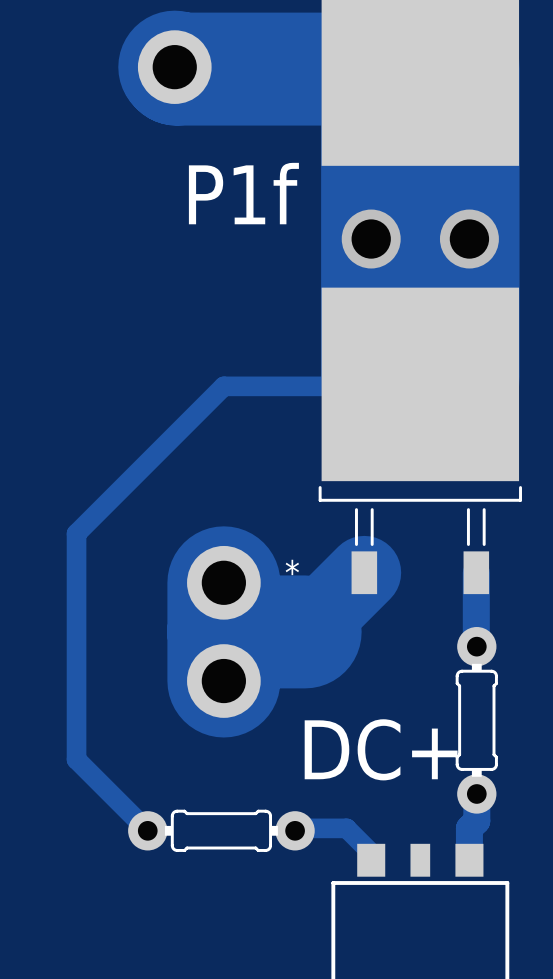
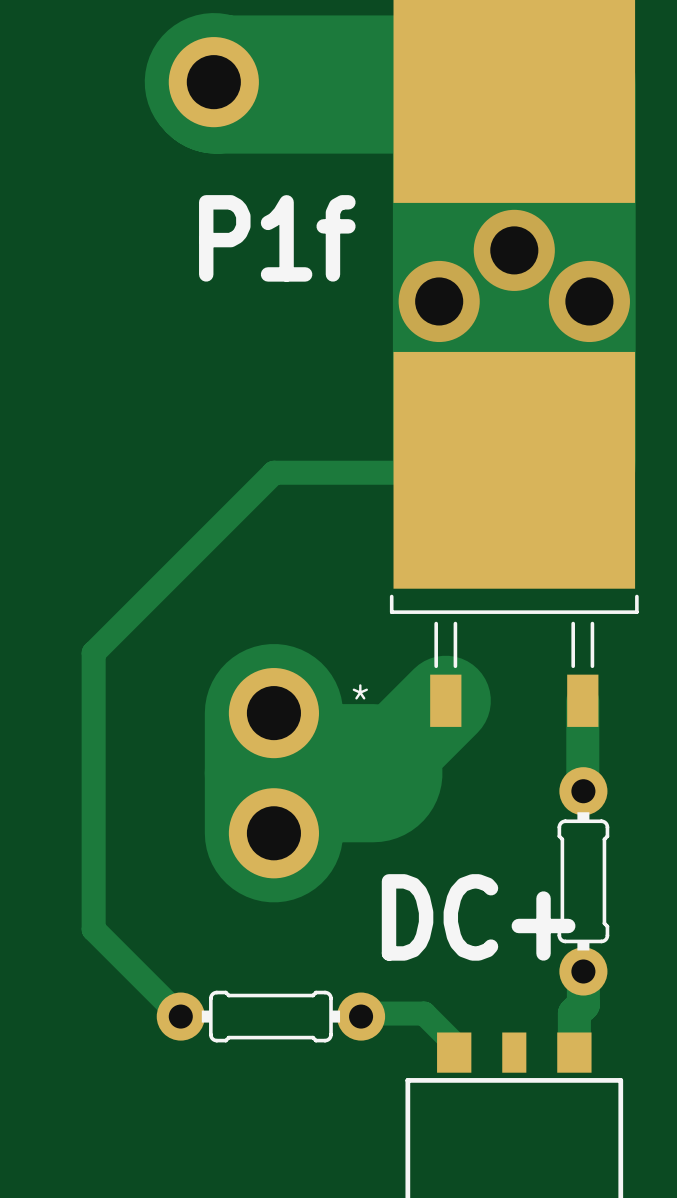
via: none -> (514, 250)
via size: [341, 209, 401, 269] -> [398, 260, 480, 343]
via size: [439, 209, 499, 269] -> [548, 260, 630, 343]

